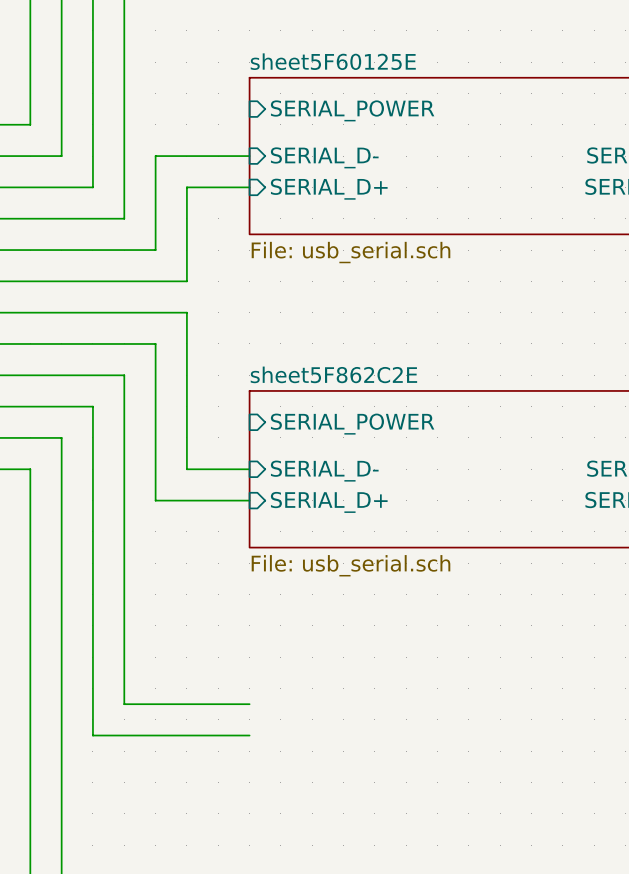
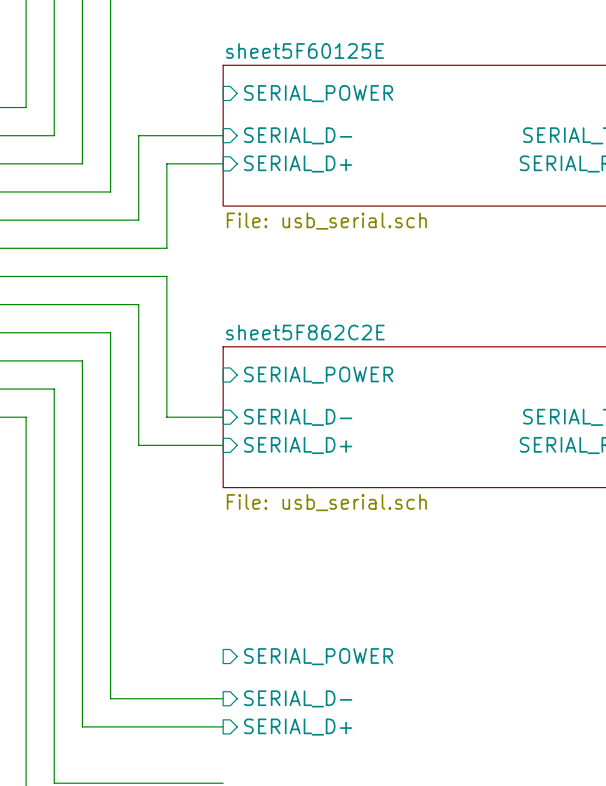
wire: (124, 704) (249, 704) -> (110, 628) (110, 698) (223, 698)
wire: (92, 735) (249, 735) -> (82, 656) (82, 726) (223, 726)
sheet pin: none -> SERIAL_POWER (318, 656)
sheet pin: none -> SERIAL_D- (298, 698)
sheet pin: none -> SERIAL_D+ (298, 727)

